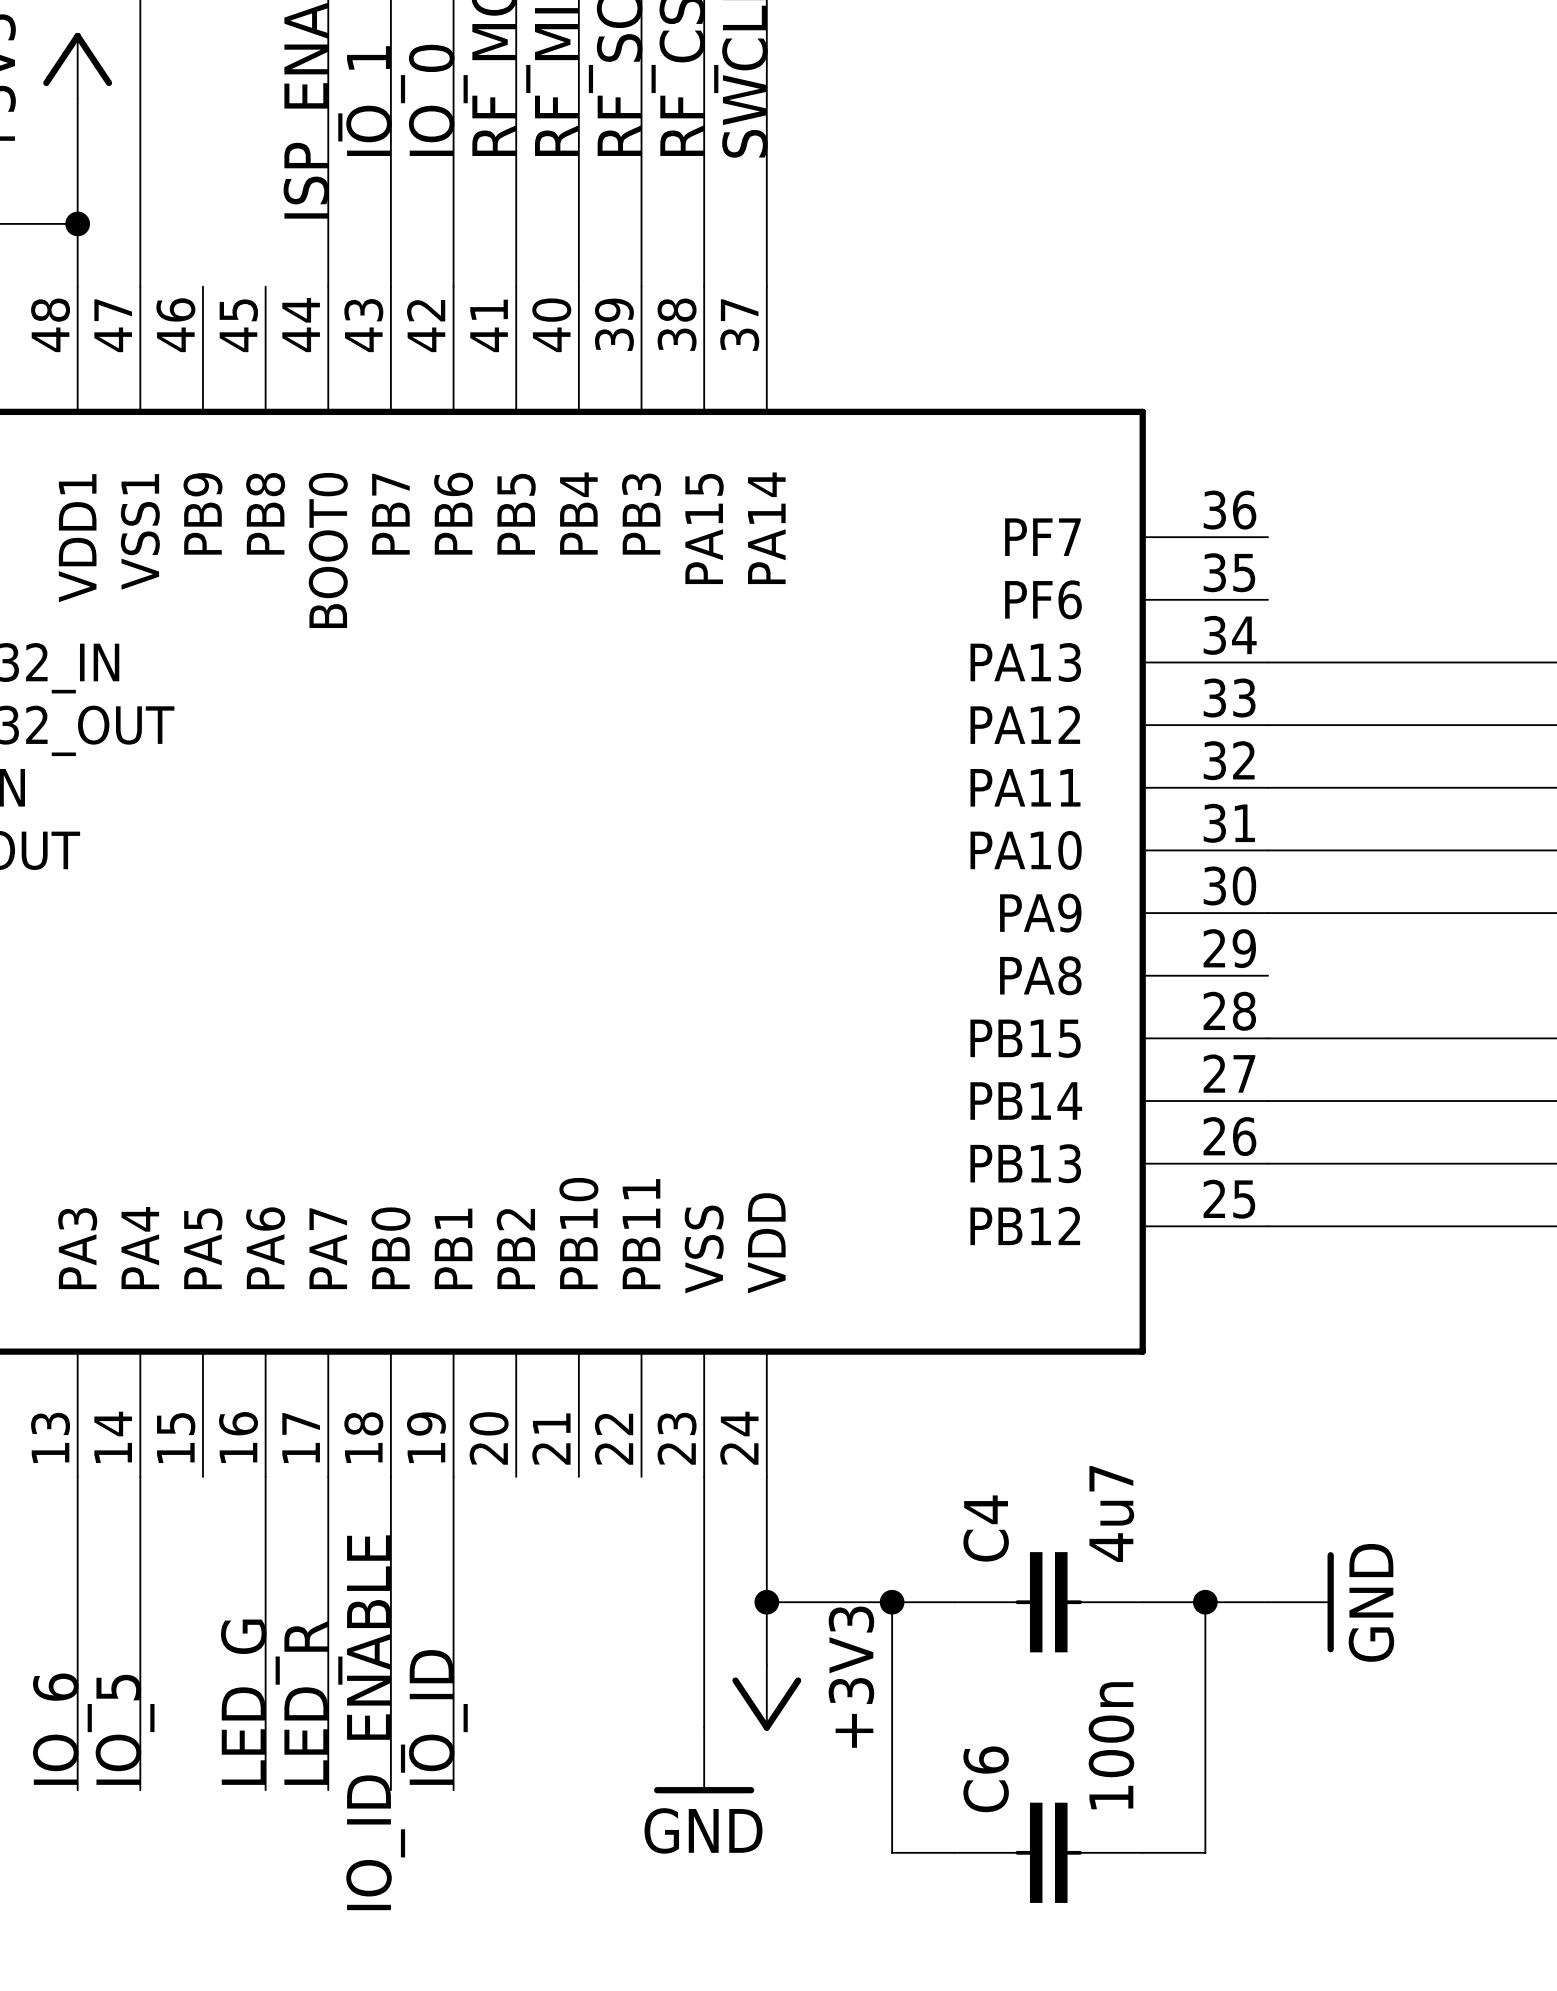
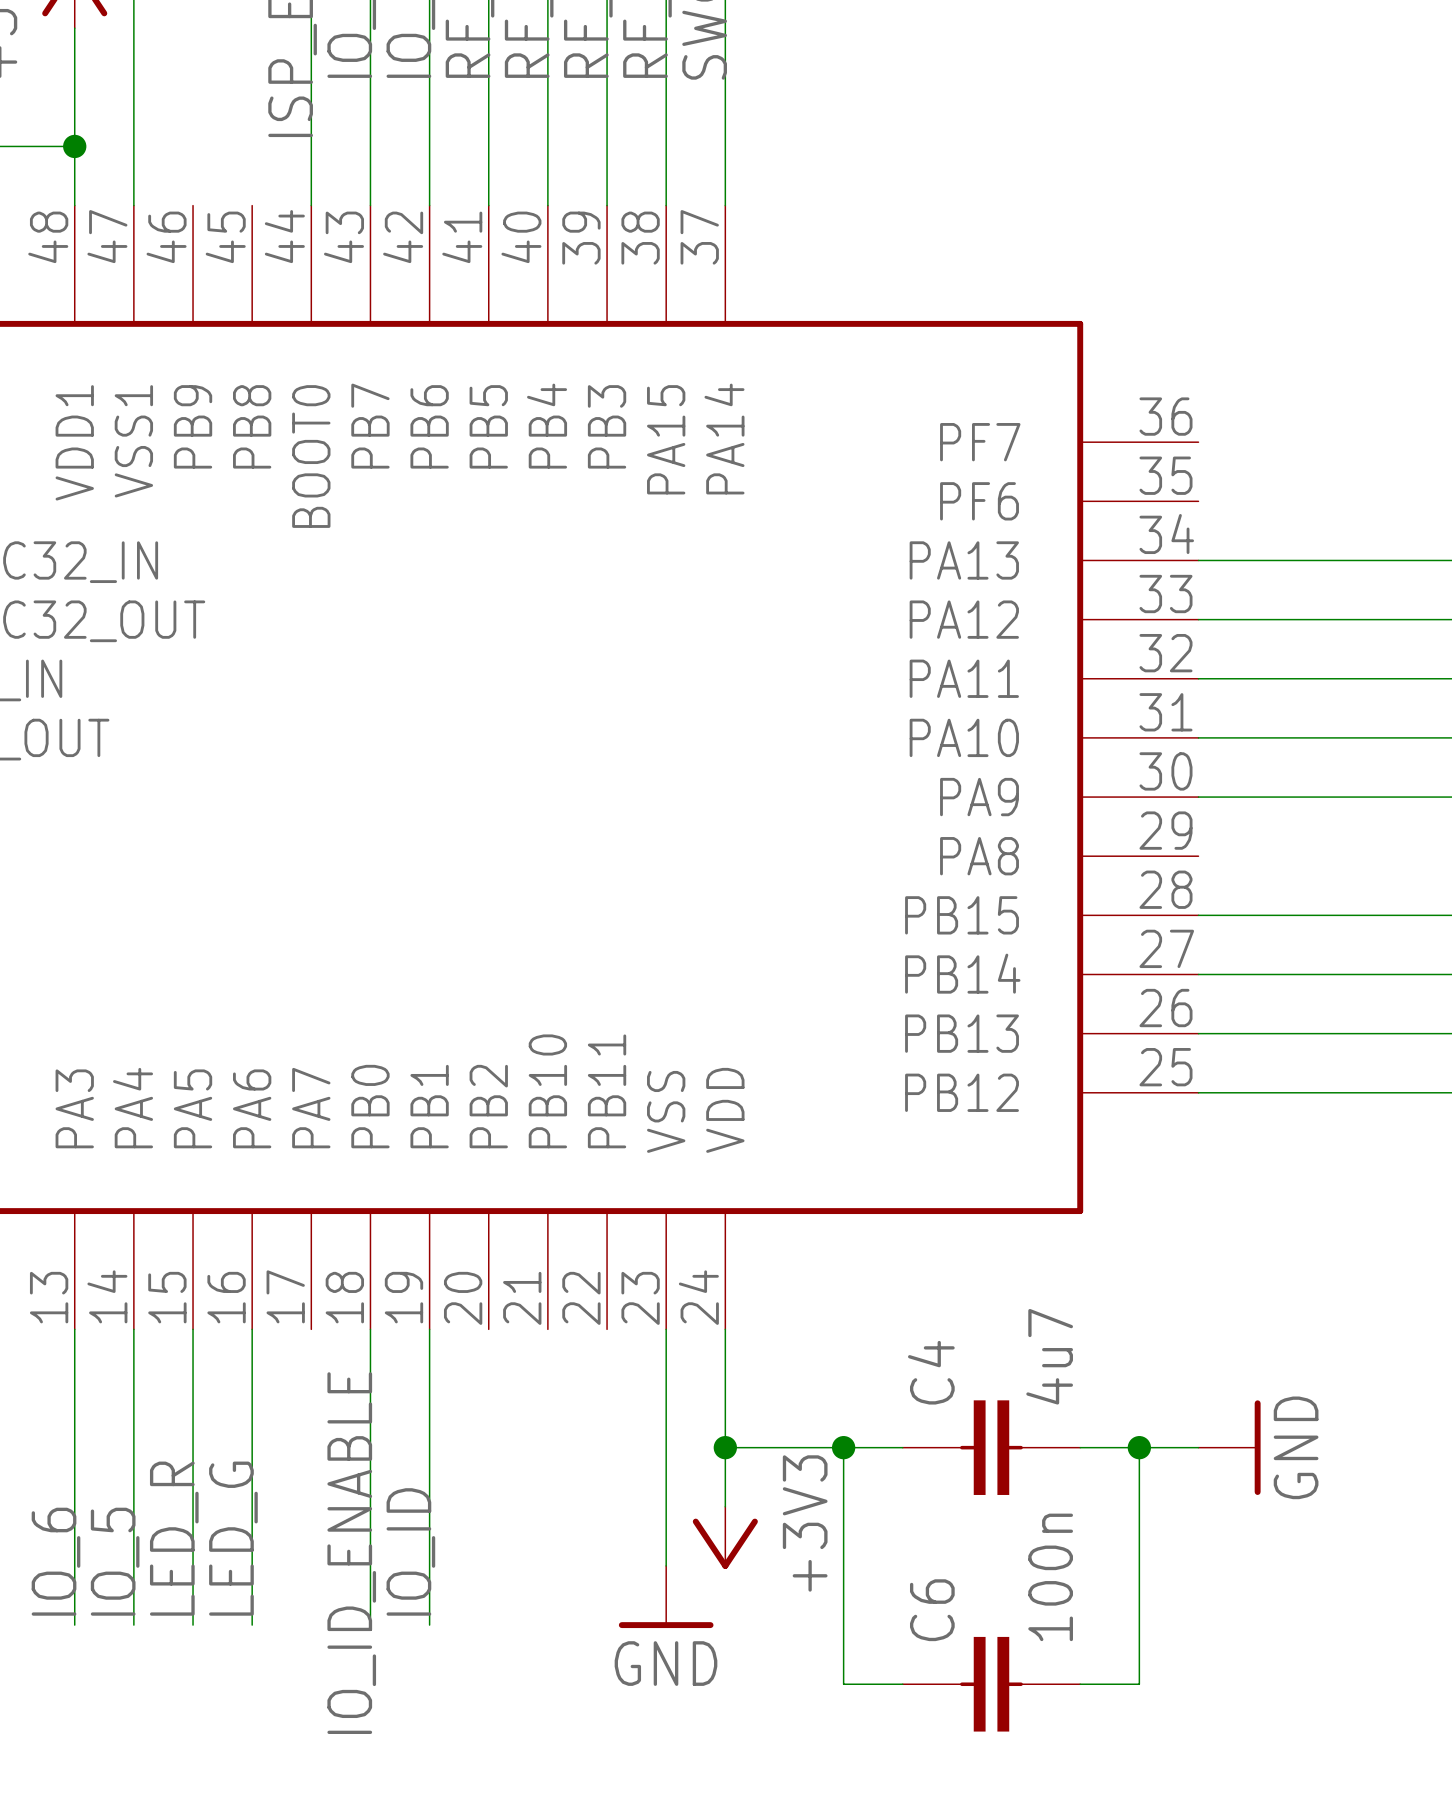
wire: (328, 1476) (328, 1790) -> (193, 1329) (193, 1625)
label position: LED_R (313, 1702) -> LED_R (174, 1538)

